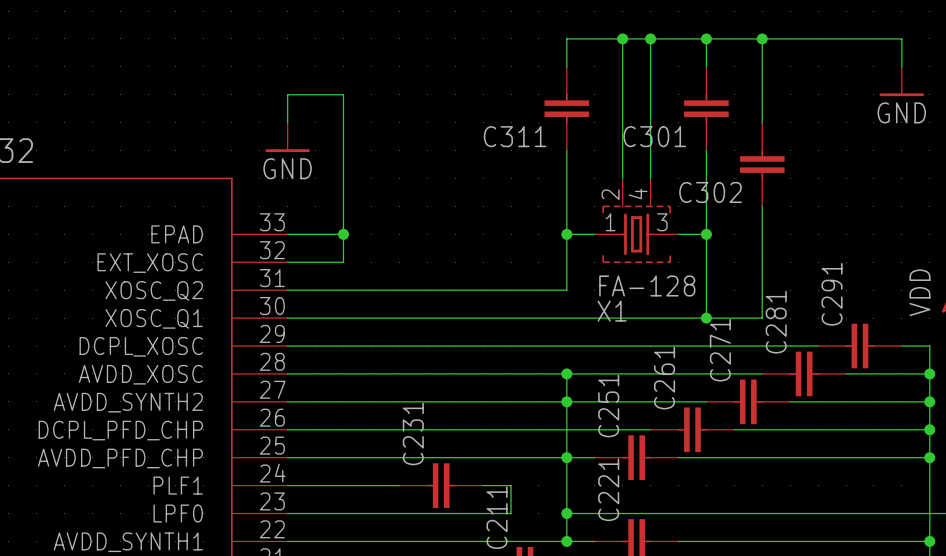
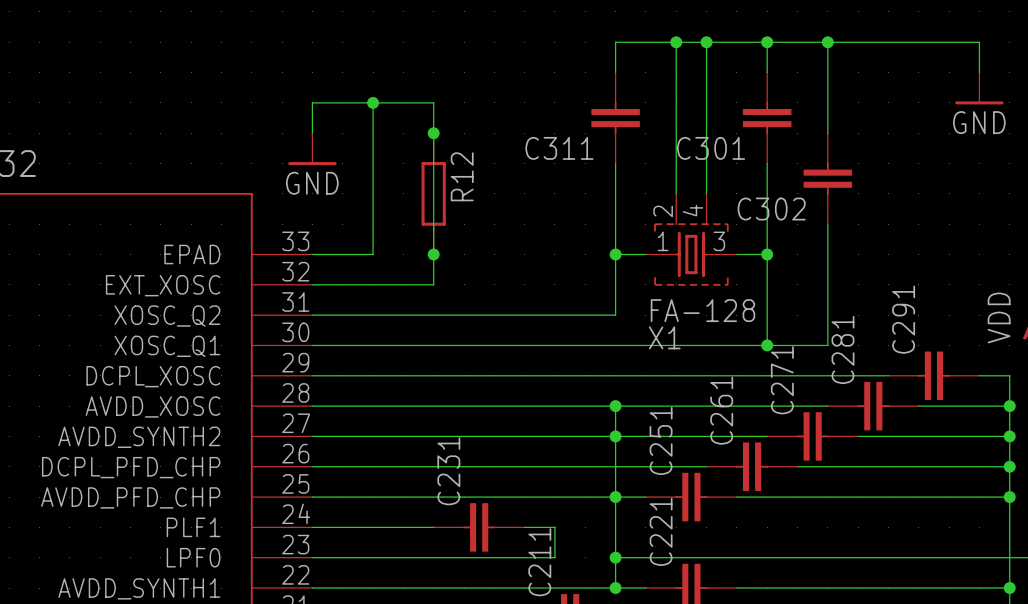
junction: none -> (373, 102)
junction: none -> (433, 133)
R12: none -> (433, 193)
wire: (343, 234) (343, 262) -> (373, 102) (433, 102) (433, 284) (373, 284)
junction position: (343, 234) -> (433, 254)

